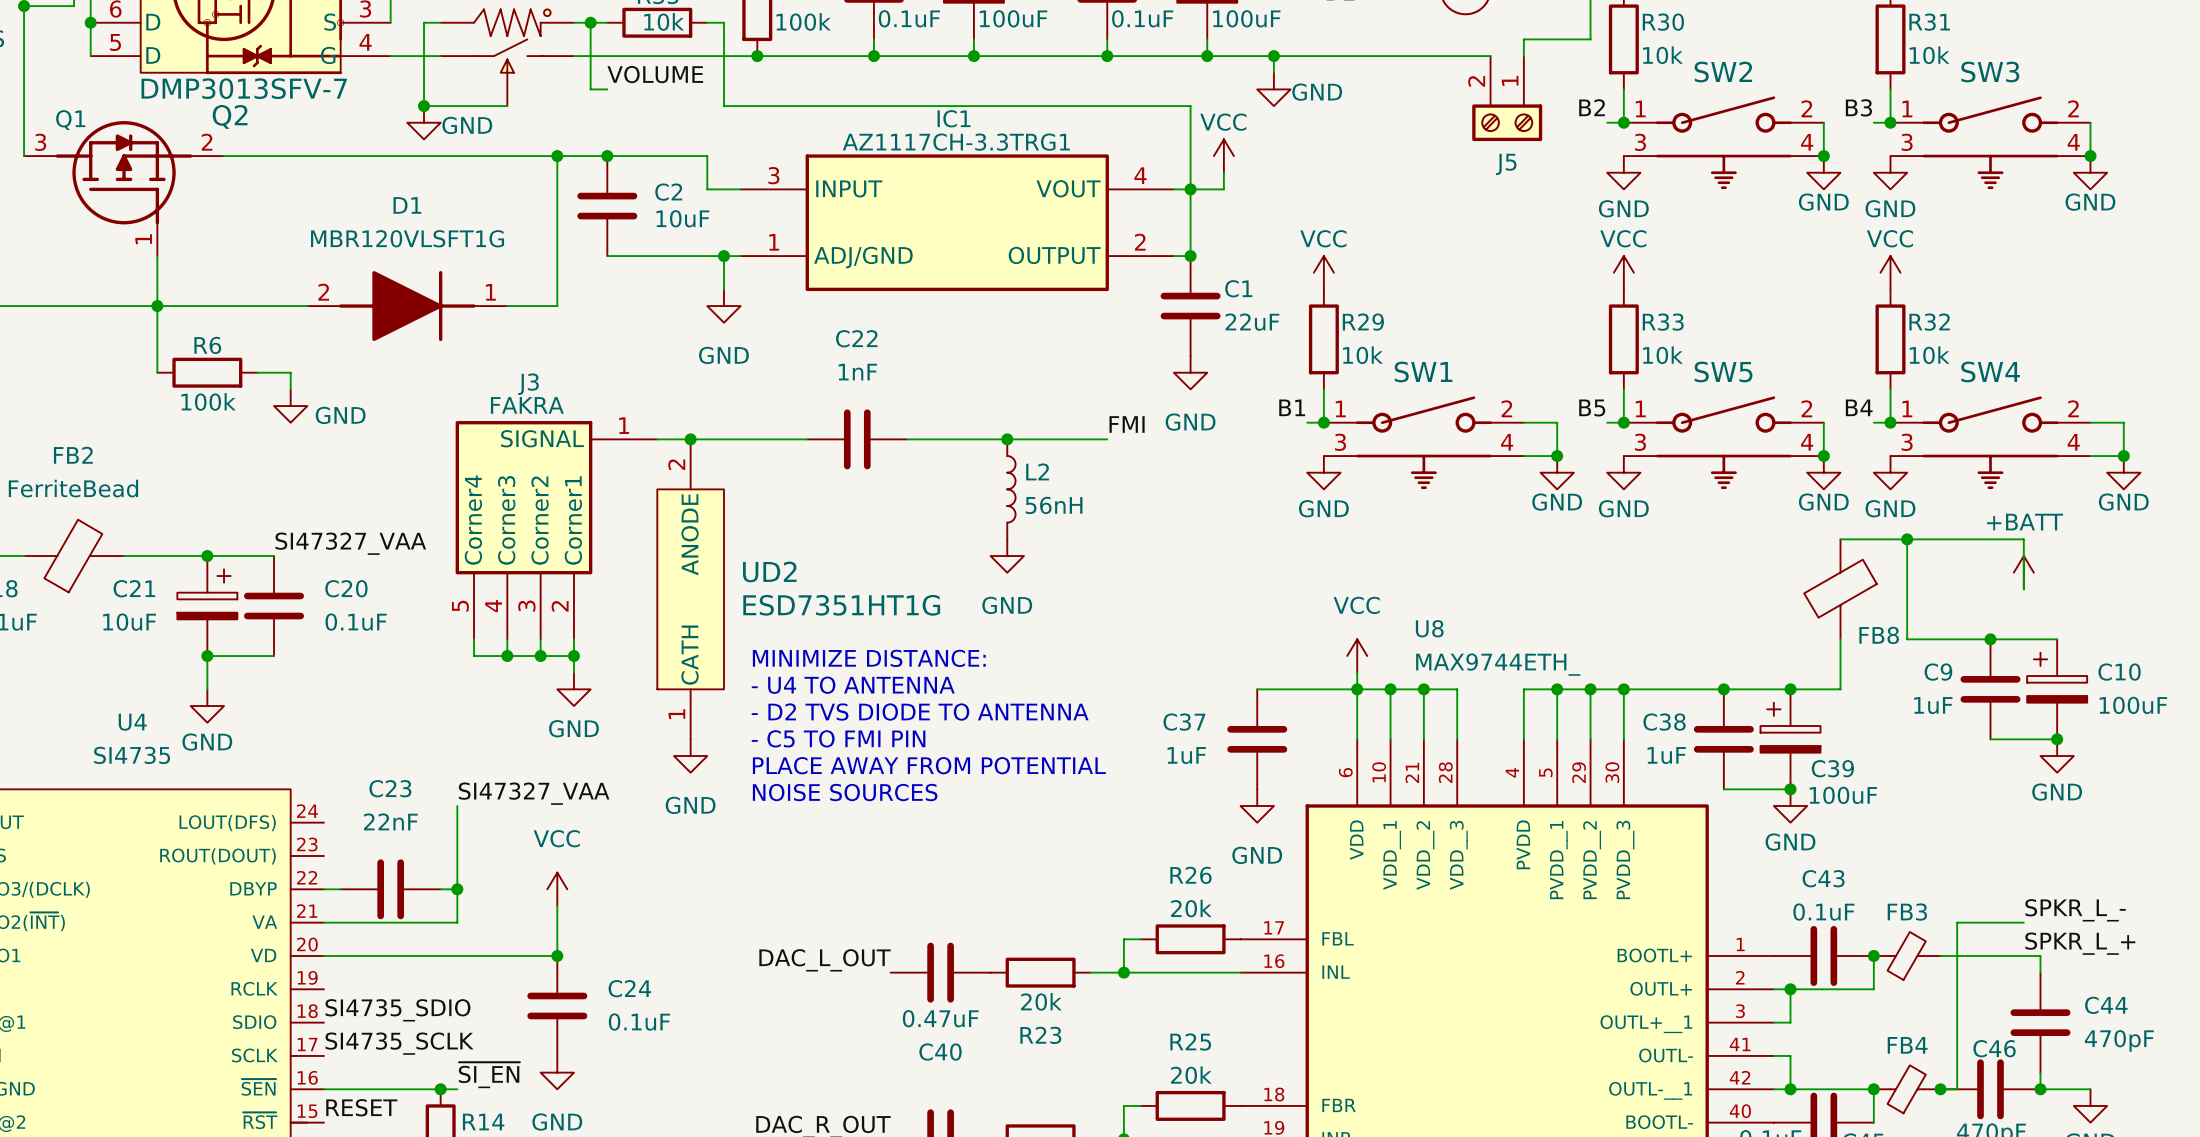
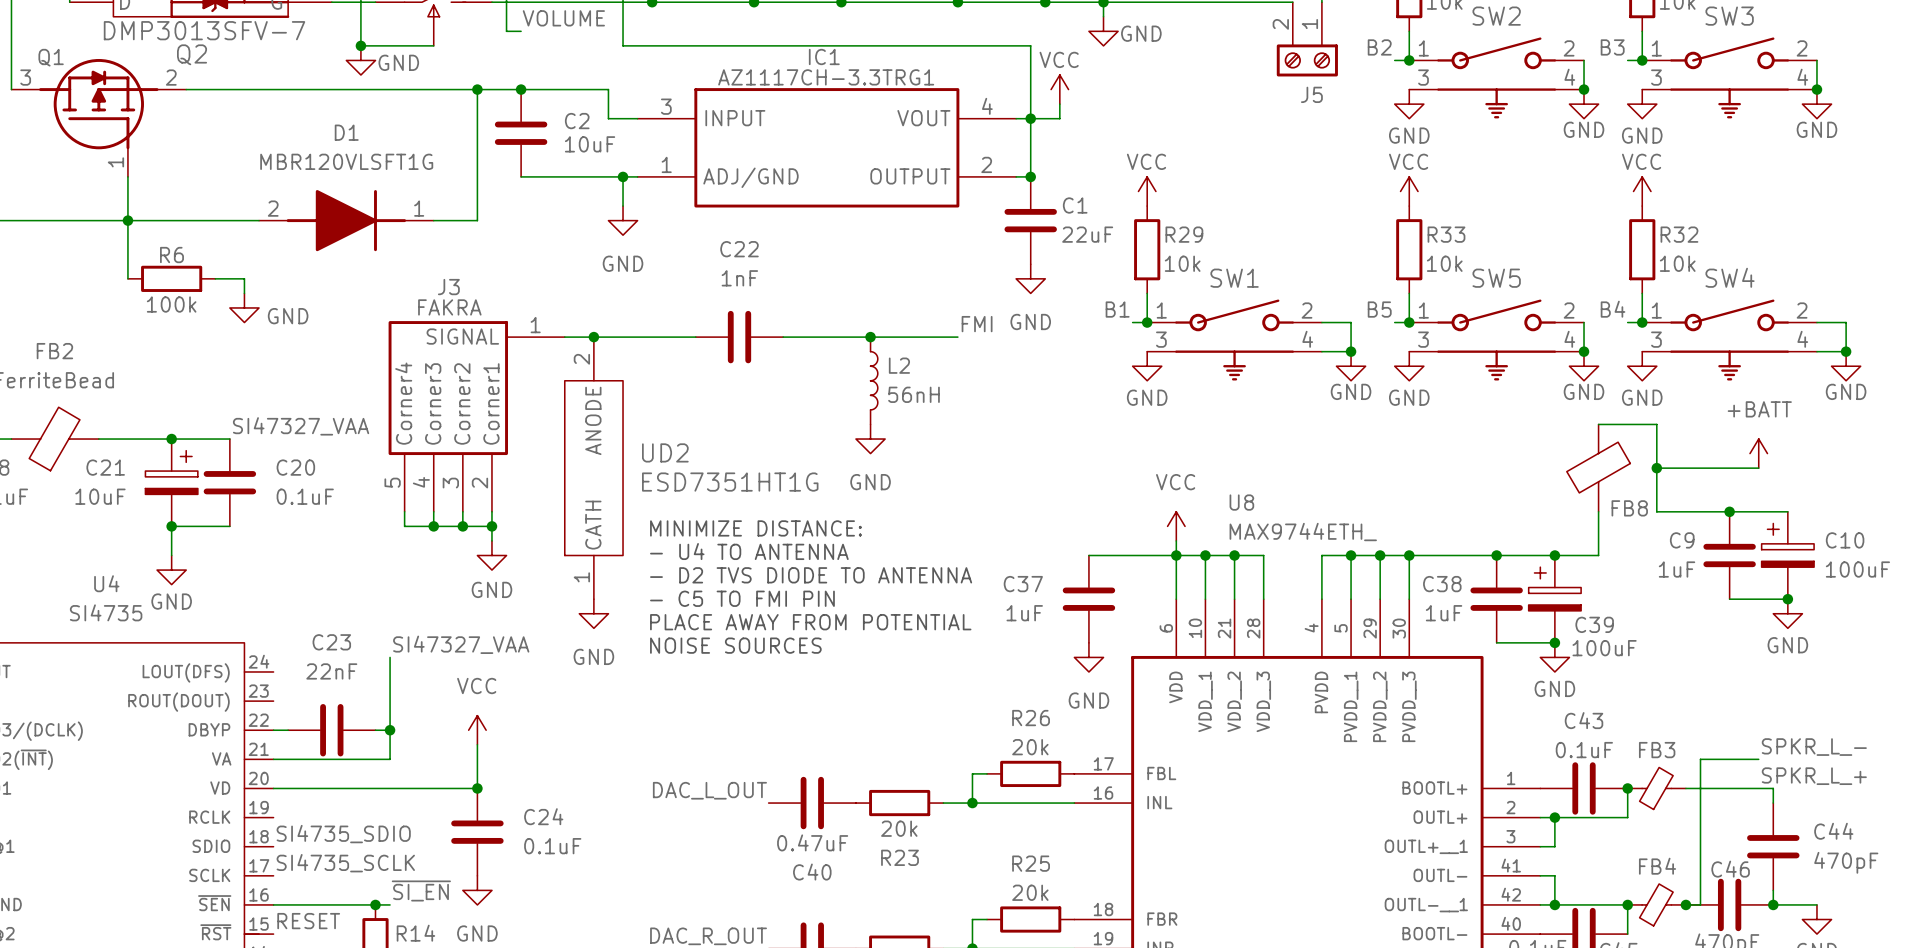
wire: (1907, 539) (2023, 539) (2023, 589) -> (1656, 468) (1758, 468)
junction position: (1907, 539) -> (1656, 468)

